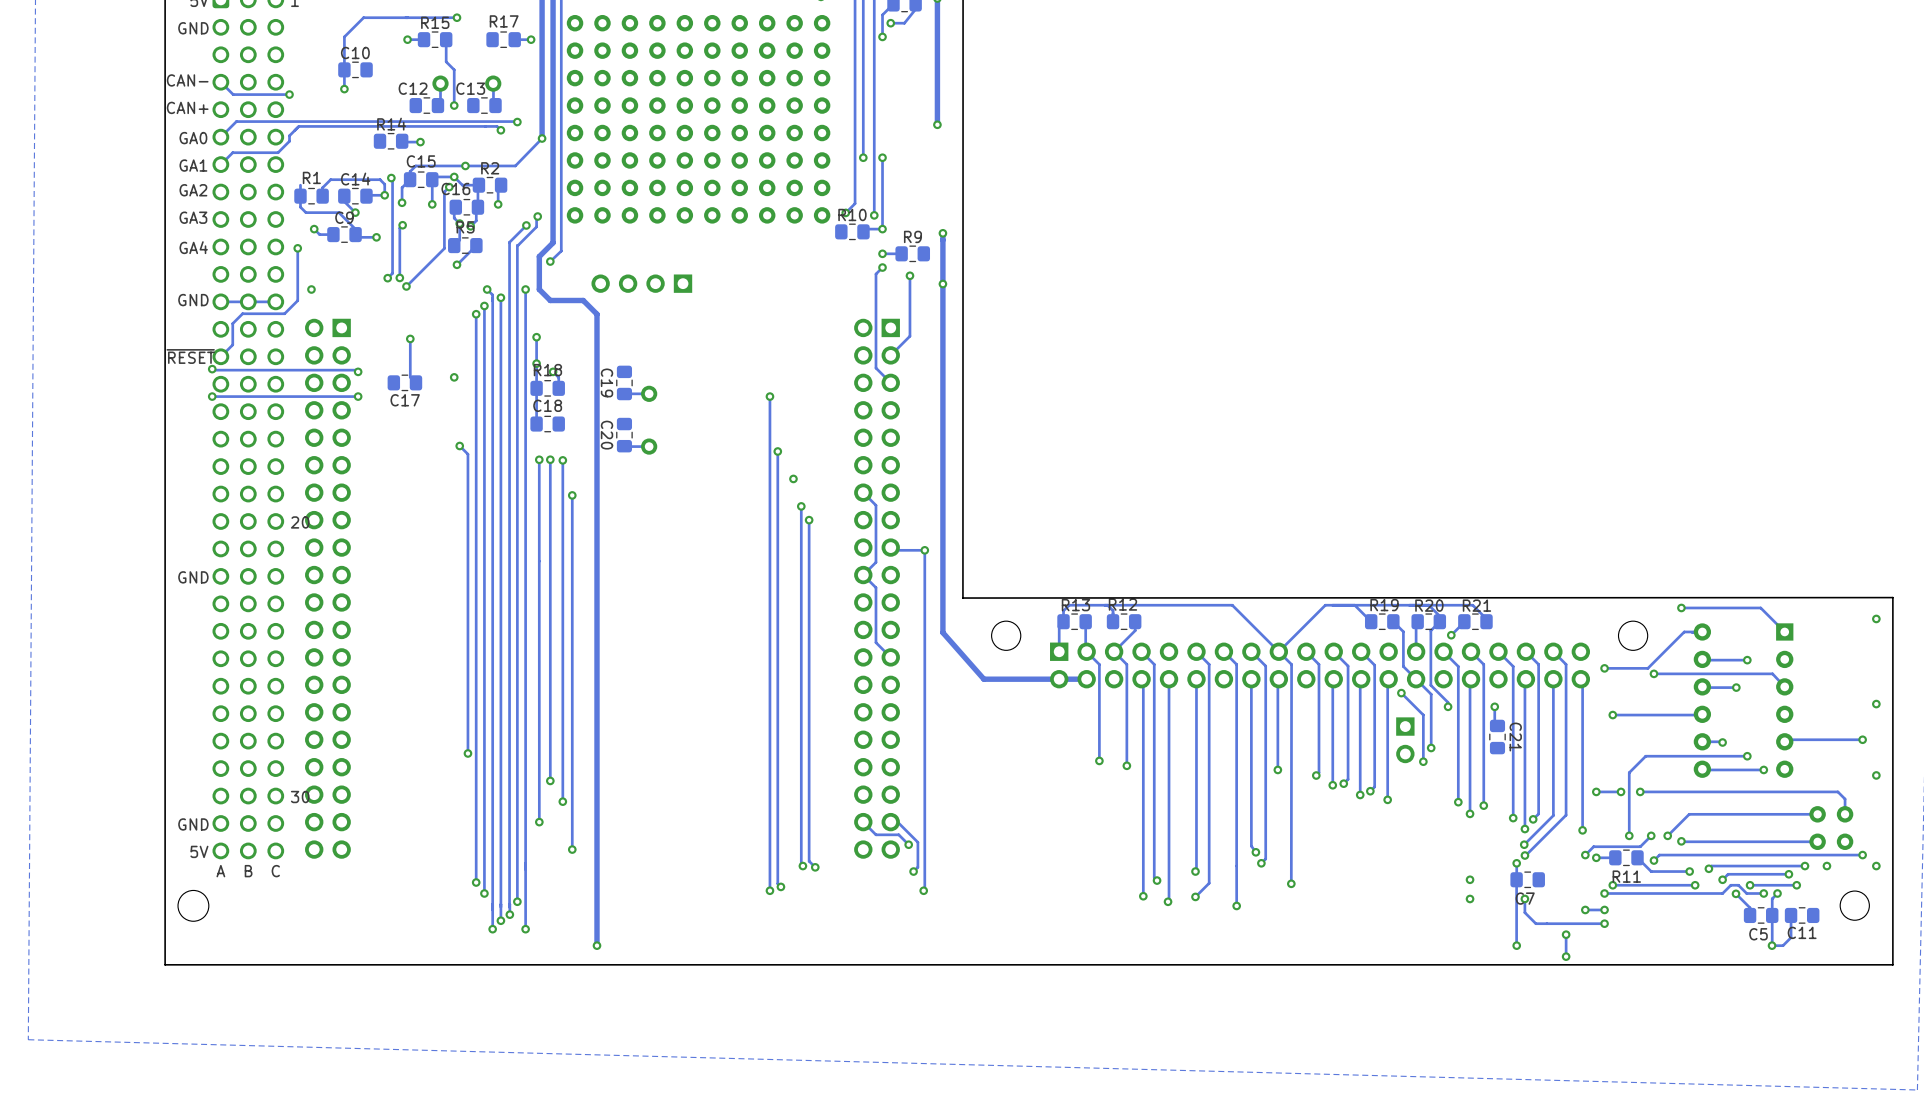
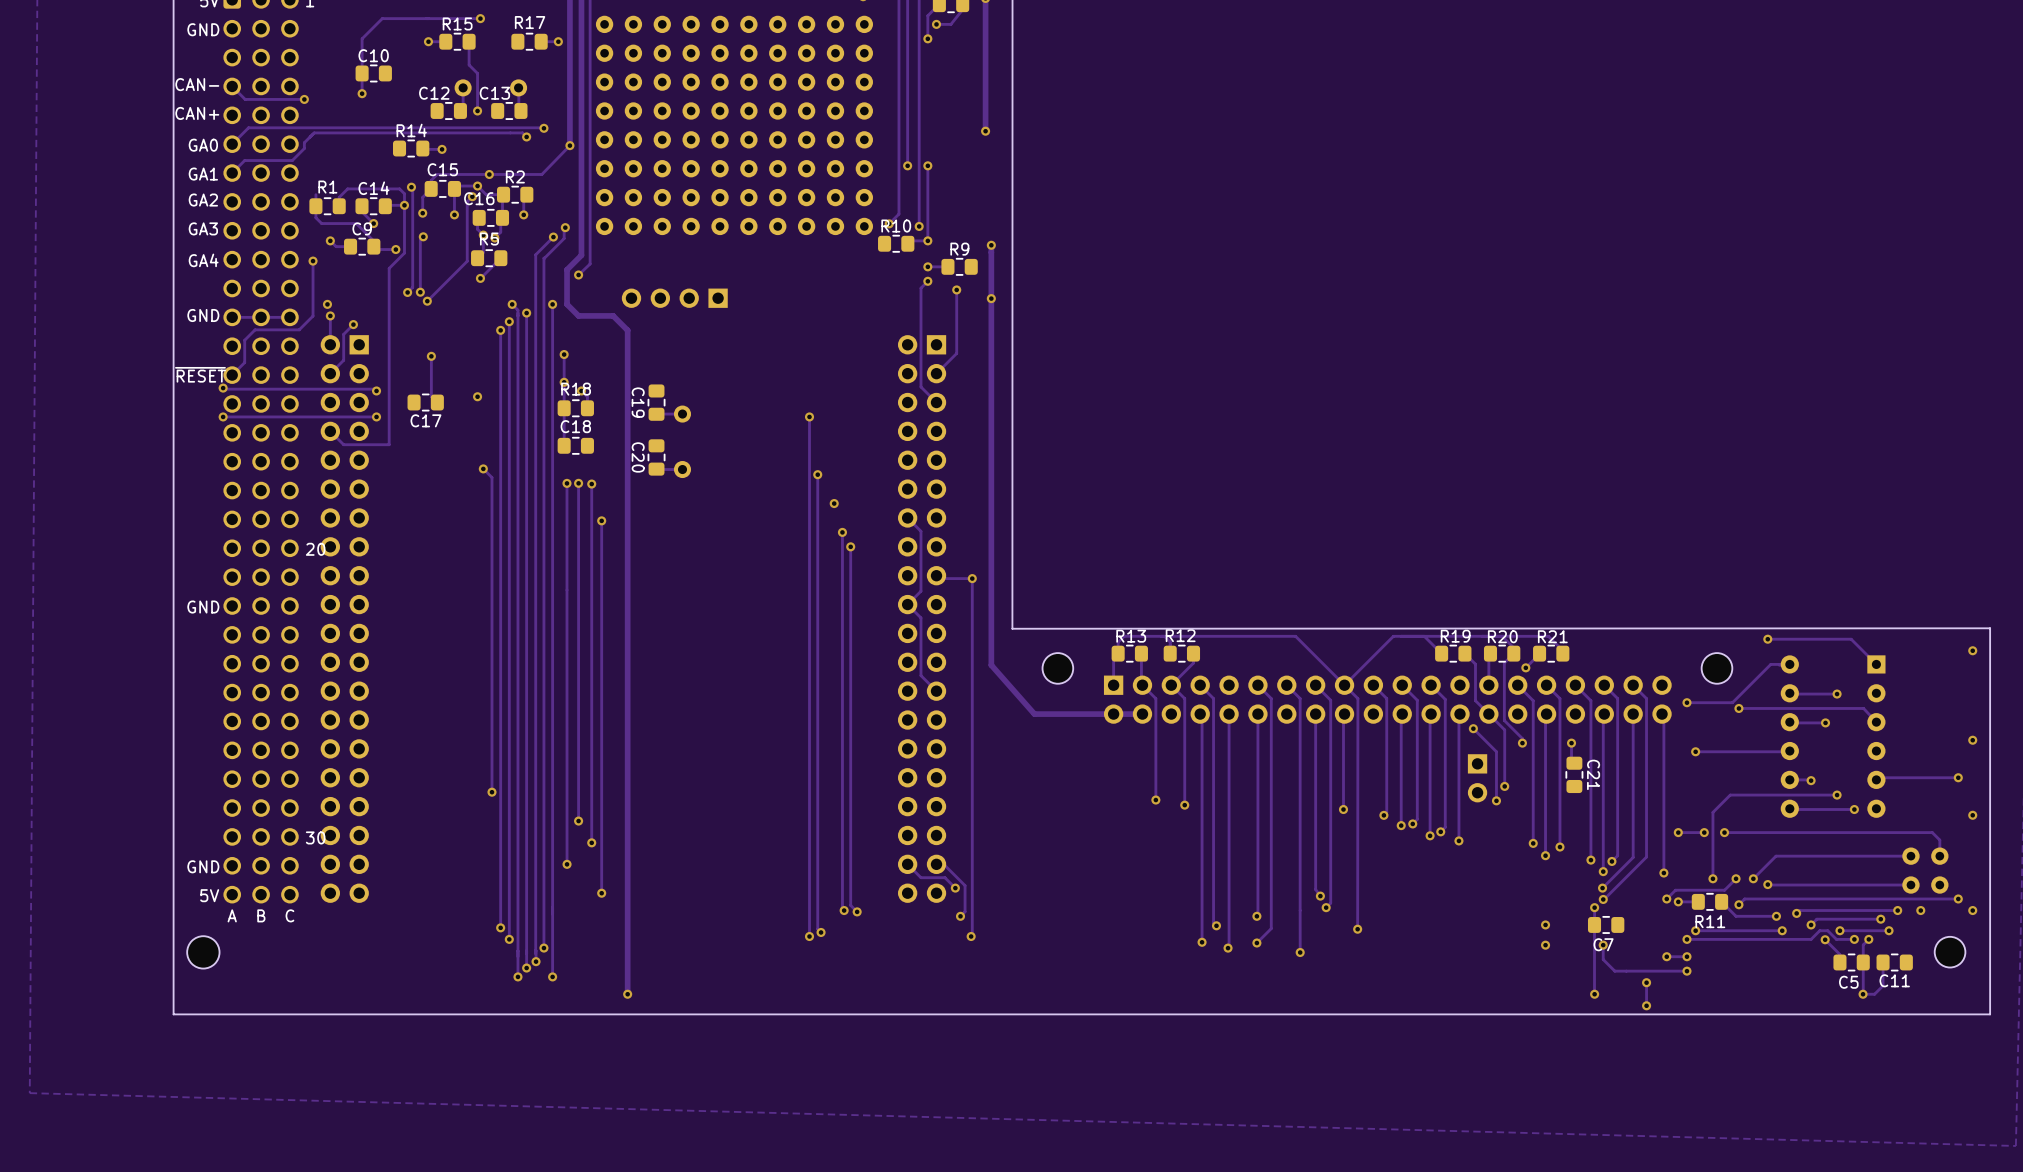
track: none -> (404, 205) (404, 253) (389, 268) (389, 444) (343, 444) (330, 431)
track: none -> (330, 315) (330, 344)
via: none -> (330, 315)
track: none -> (353, 324) (343, 334) (343, 360) (330, 373)
via: none -> (353, 324)

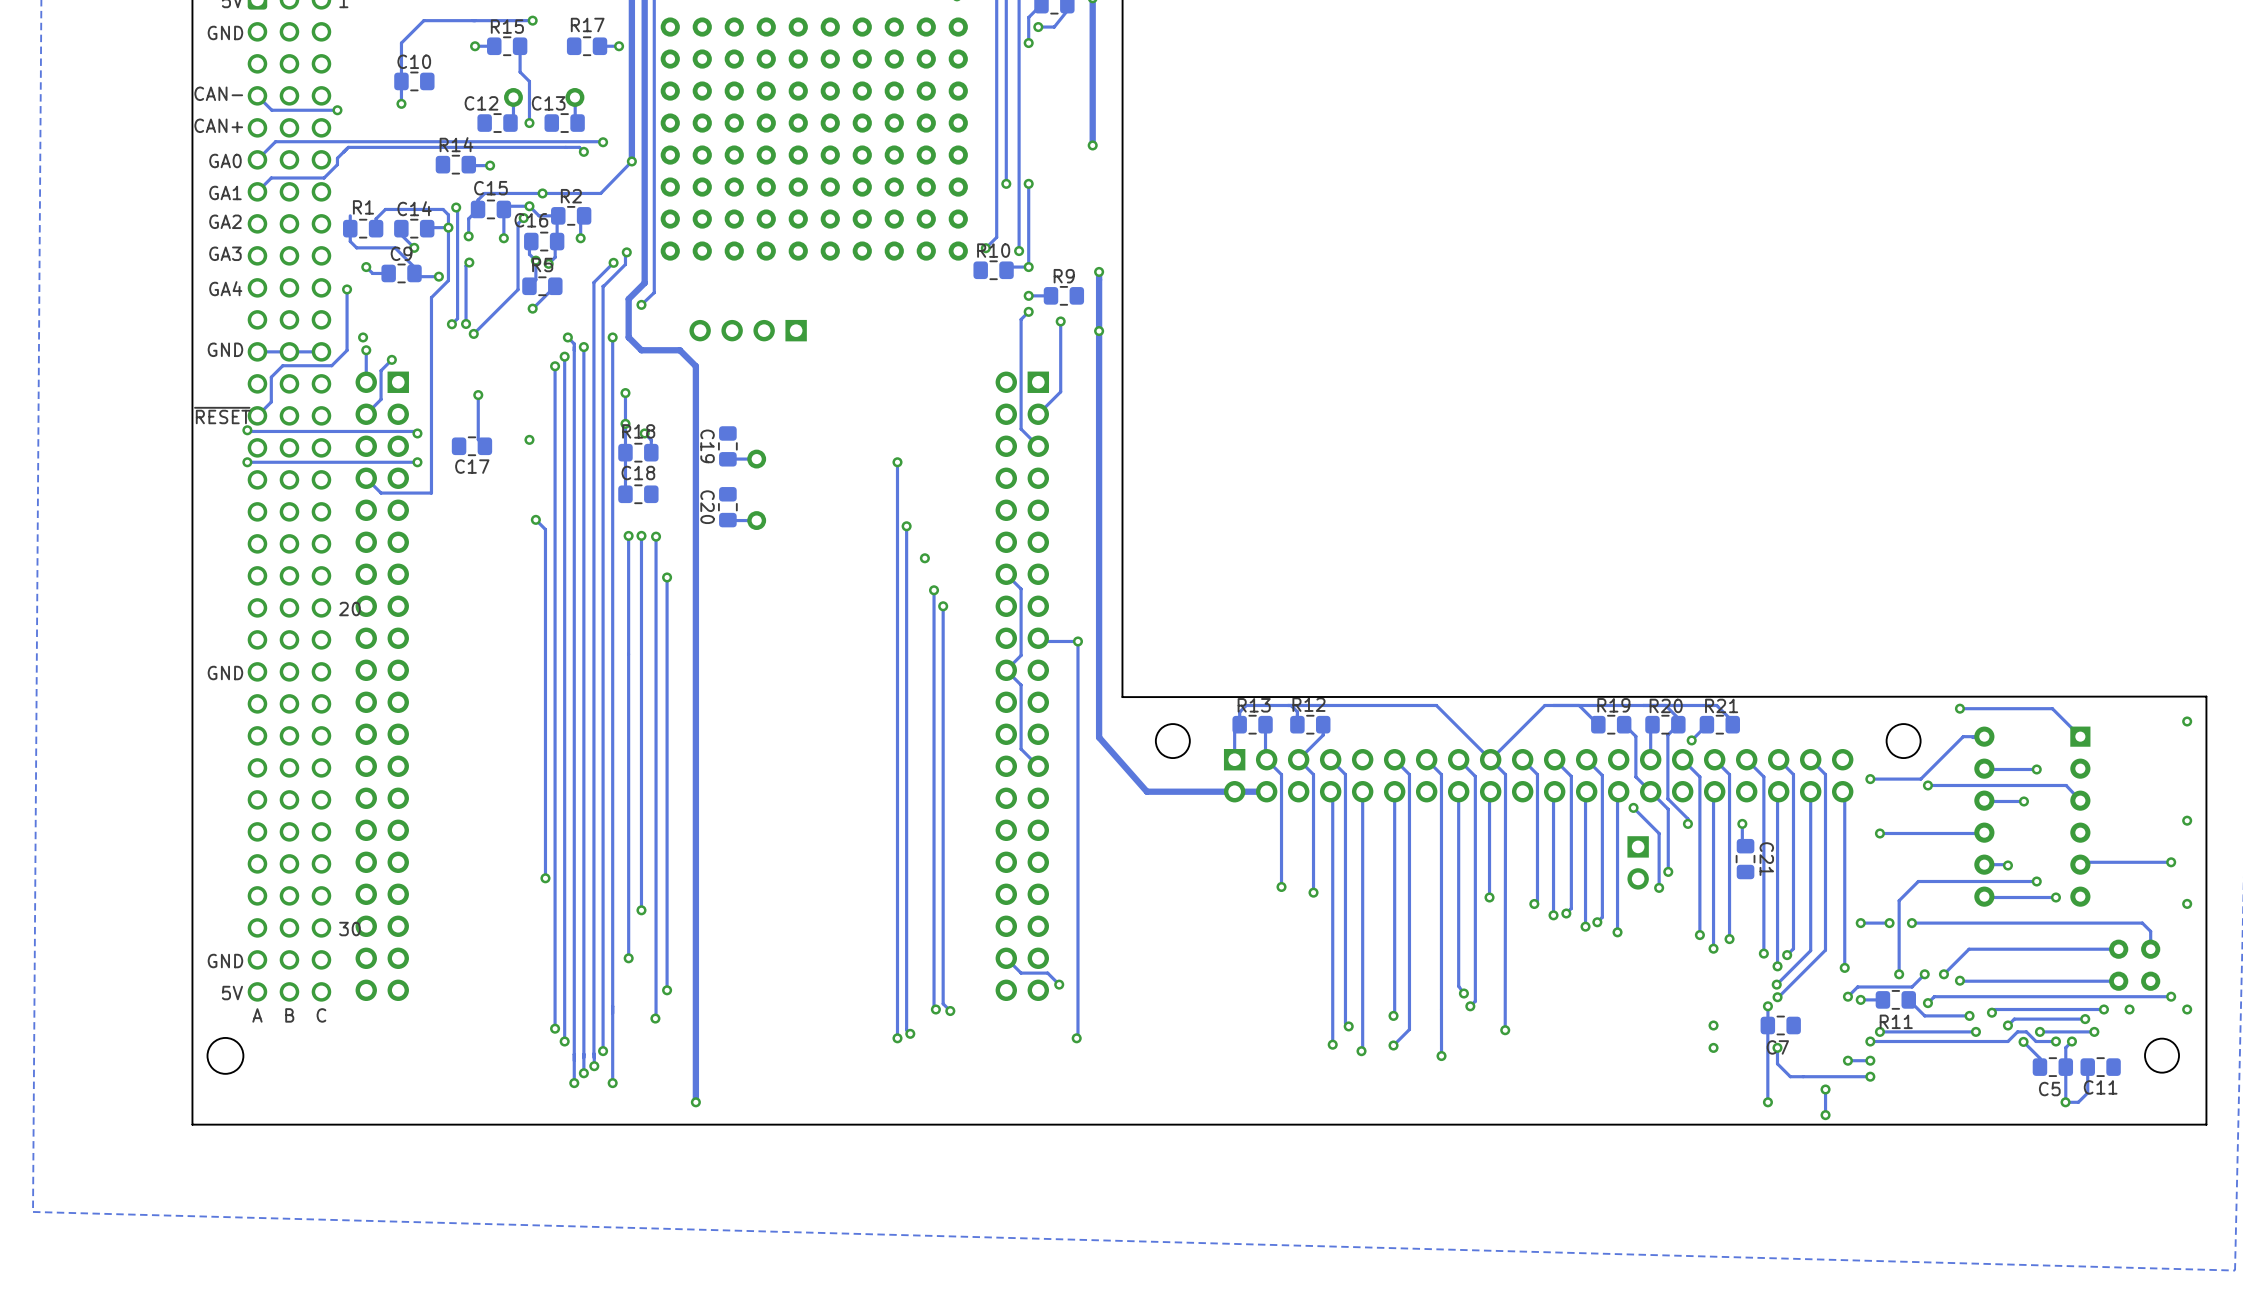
track: none -> (656, 934) (655, 1018)
via: (591, 842) -> none
track: (936, 864) (943, 864) (965, 885) (965, 911) (960, 916) -> none
via: (960, 916) -> none
via: none -> (655, 1018)

